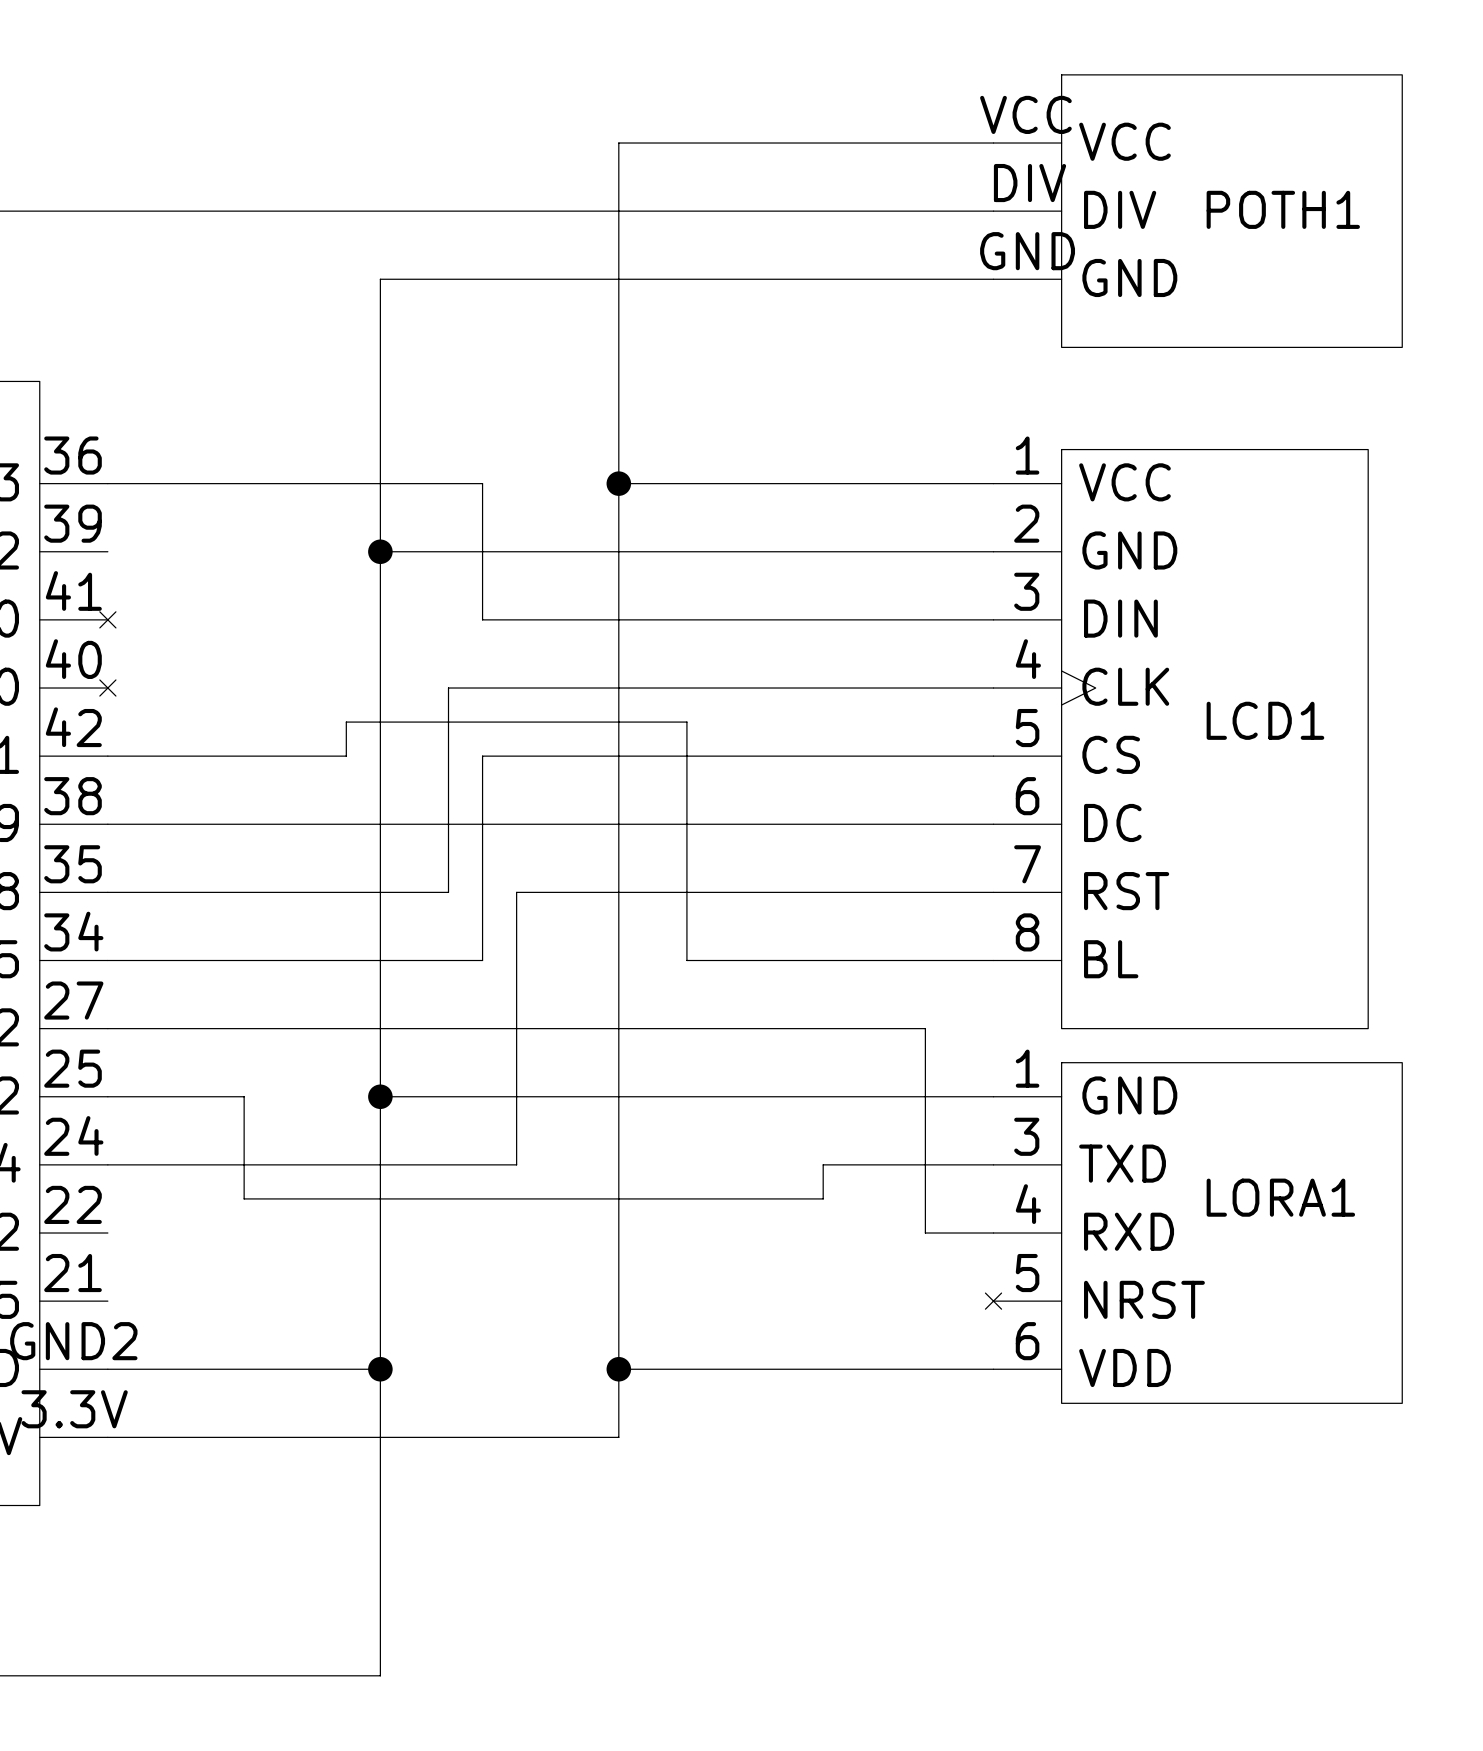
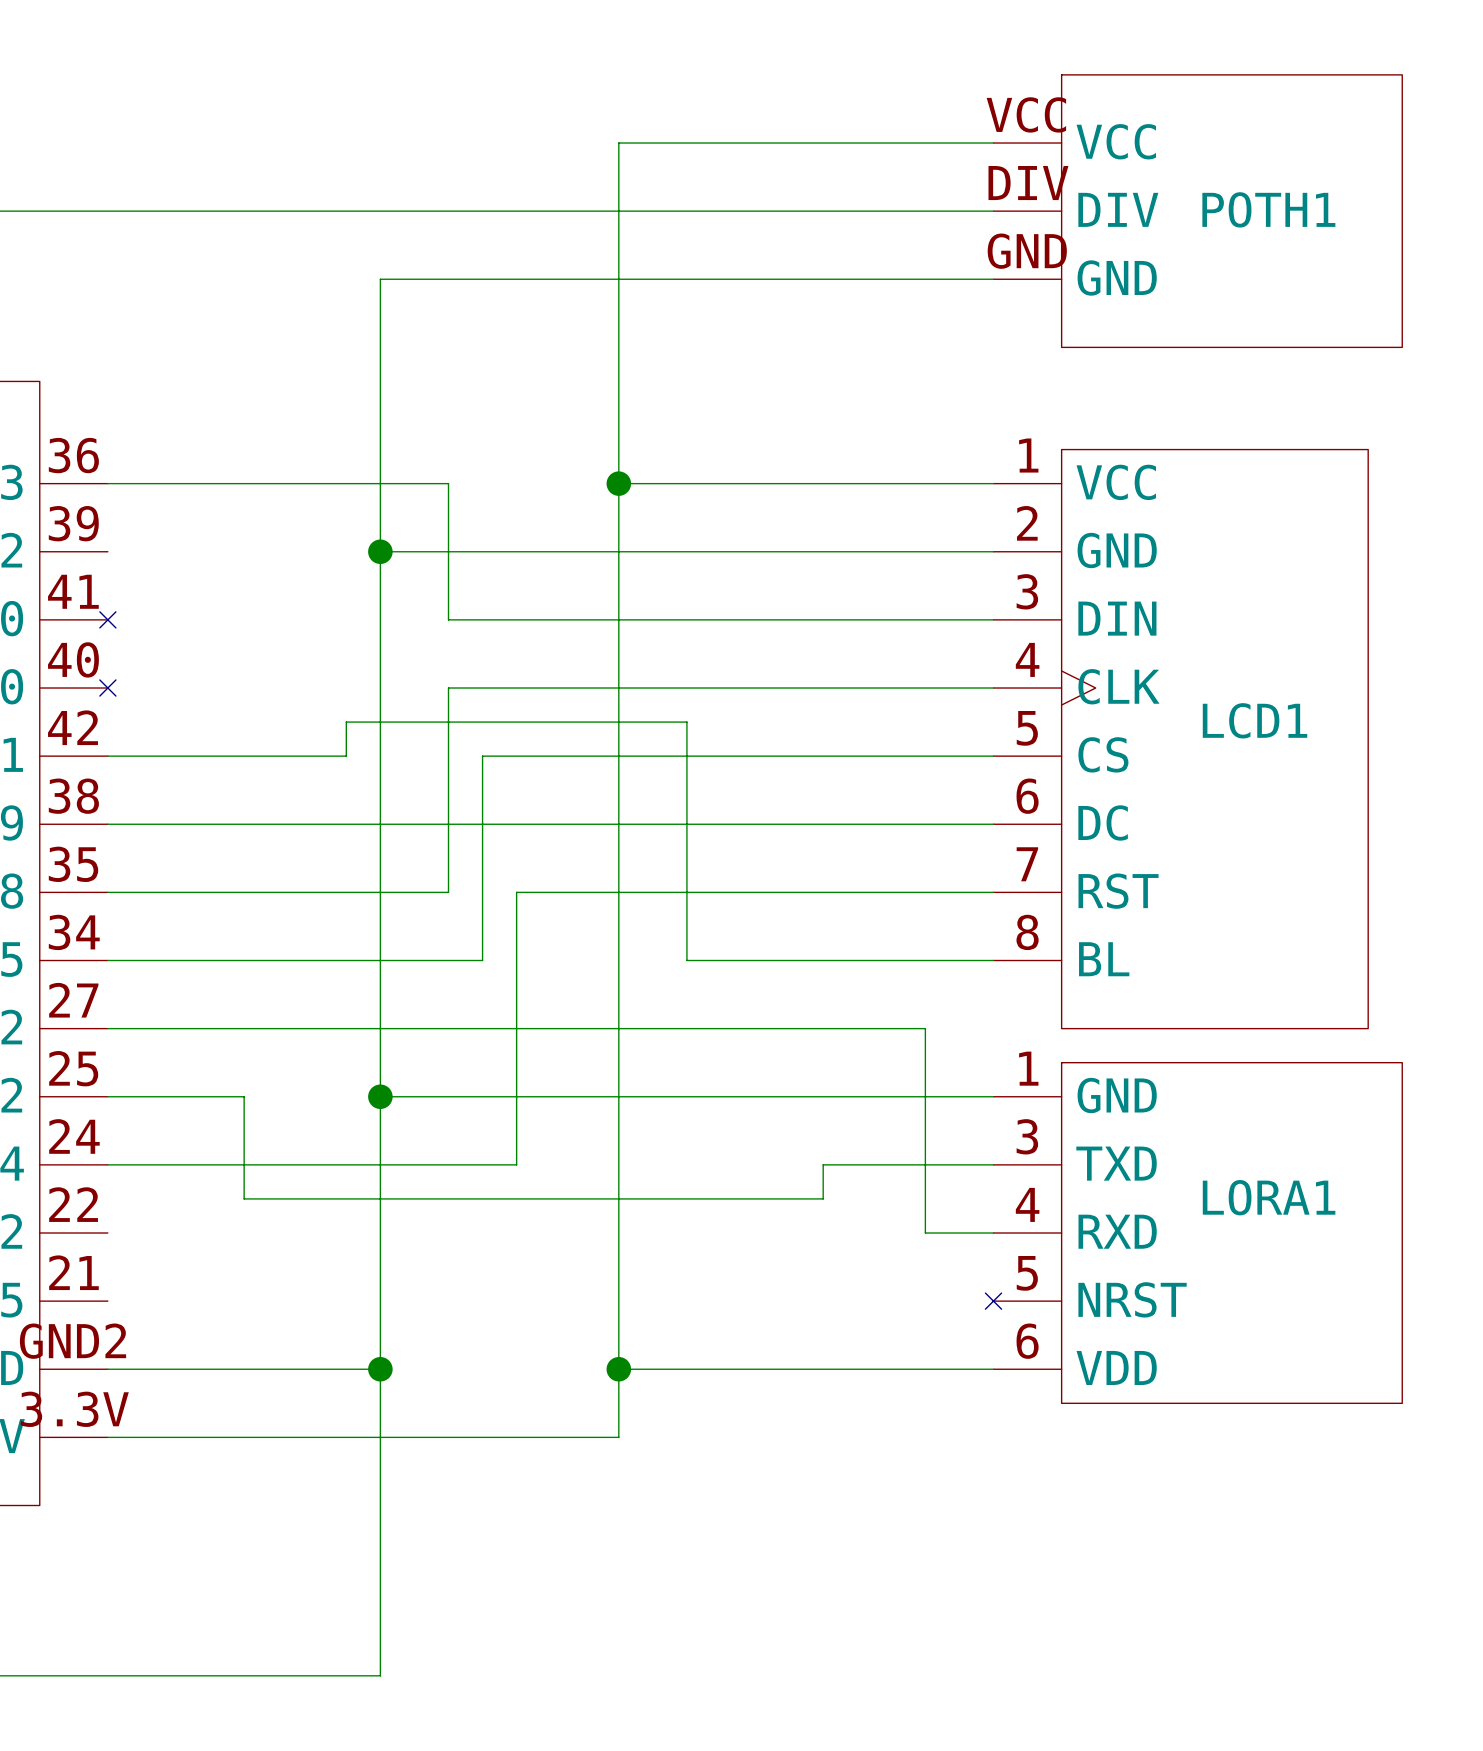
wire: (448, 483) (482, 483) (482, 619) -> (448, 483) (448, 619) (482, 619)

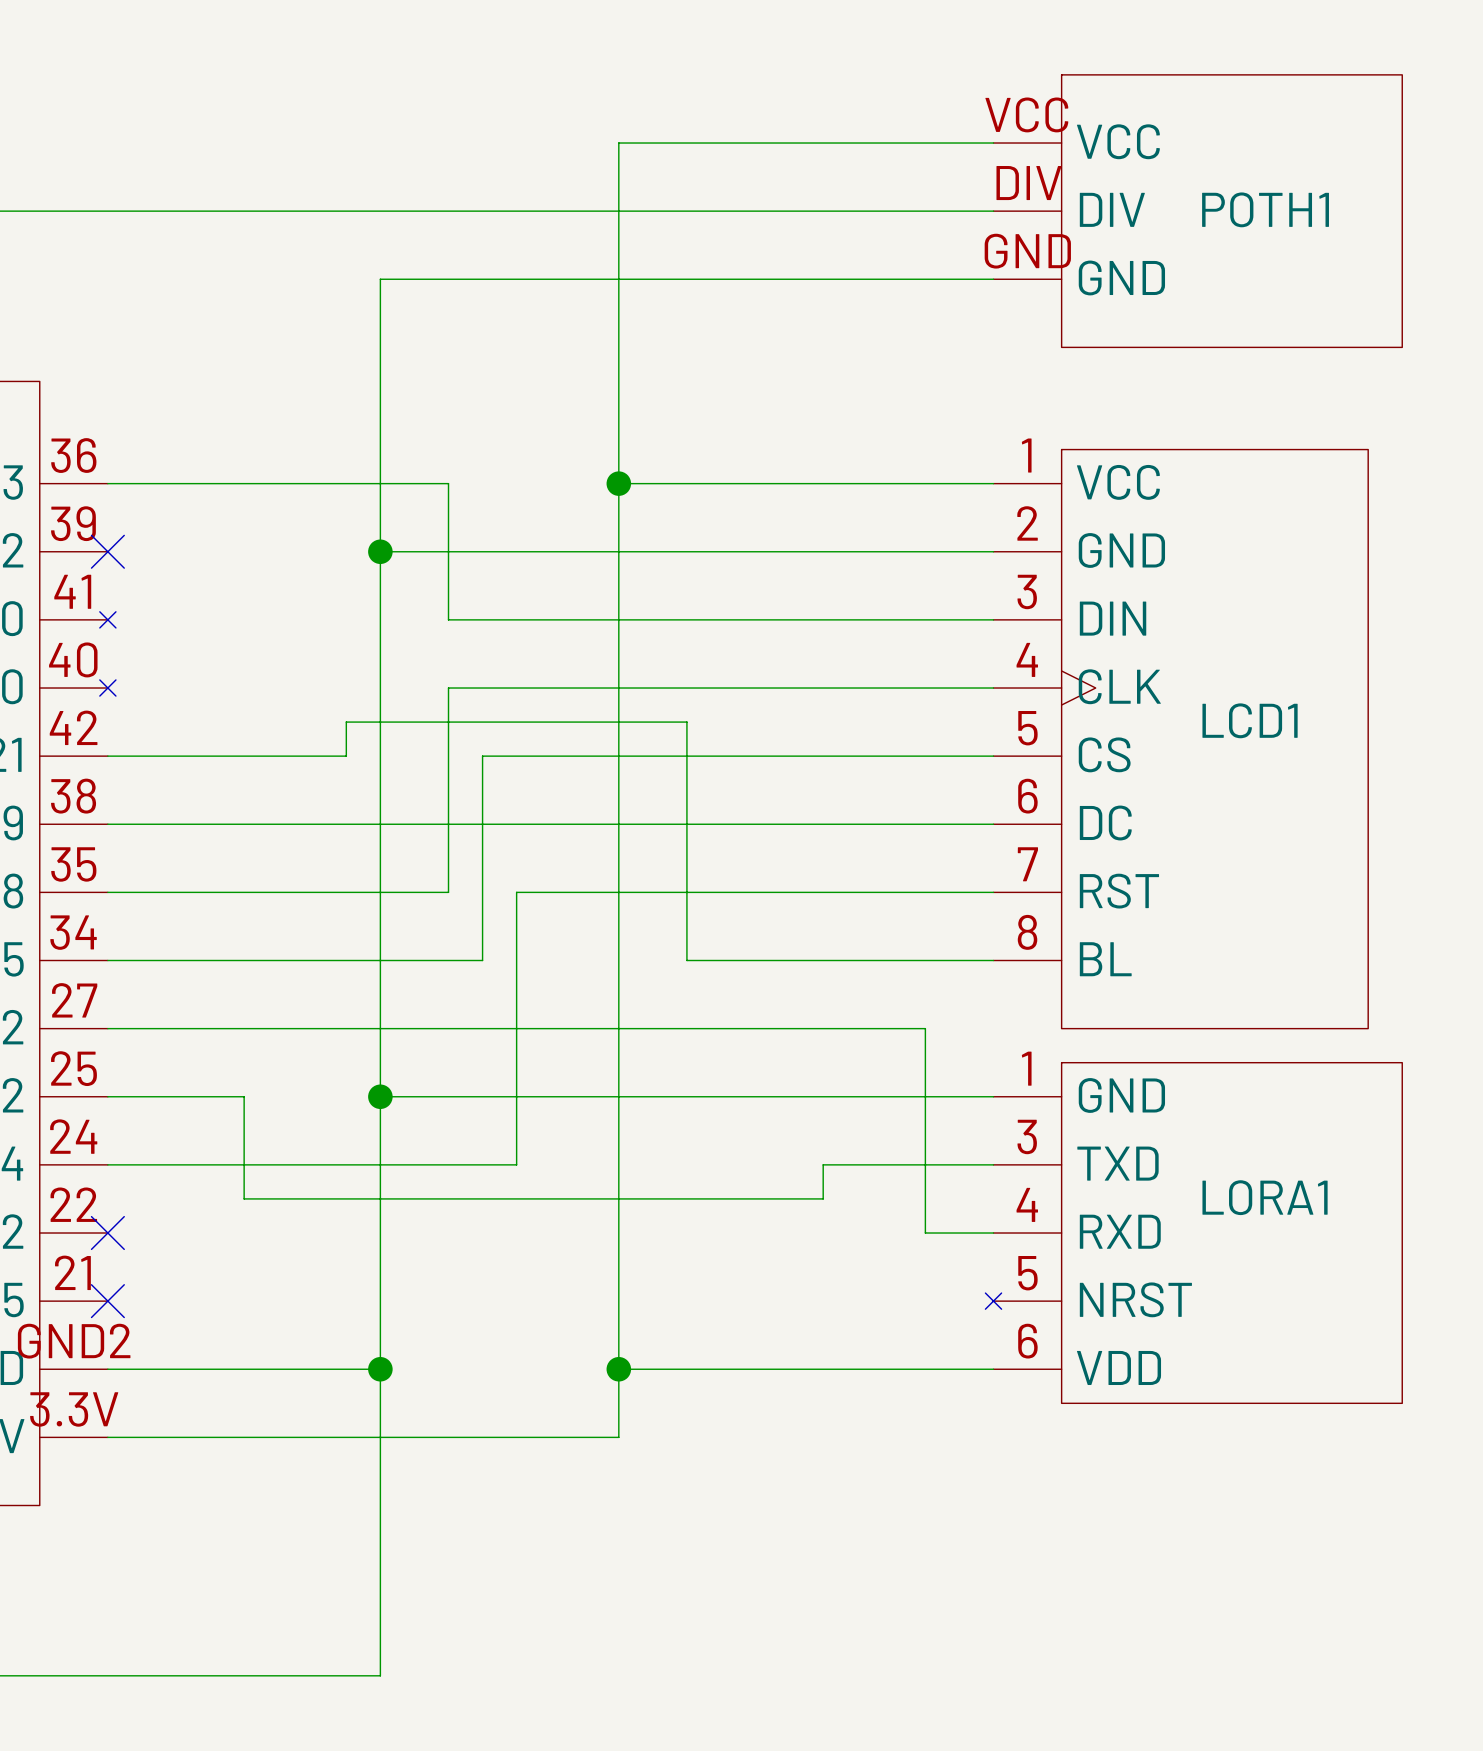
no-connect mark: none -> (107, 551)
no-connect mark: none -> (107, 1233)
no-connect mark: none -> (107, 1301)

